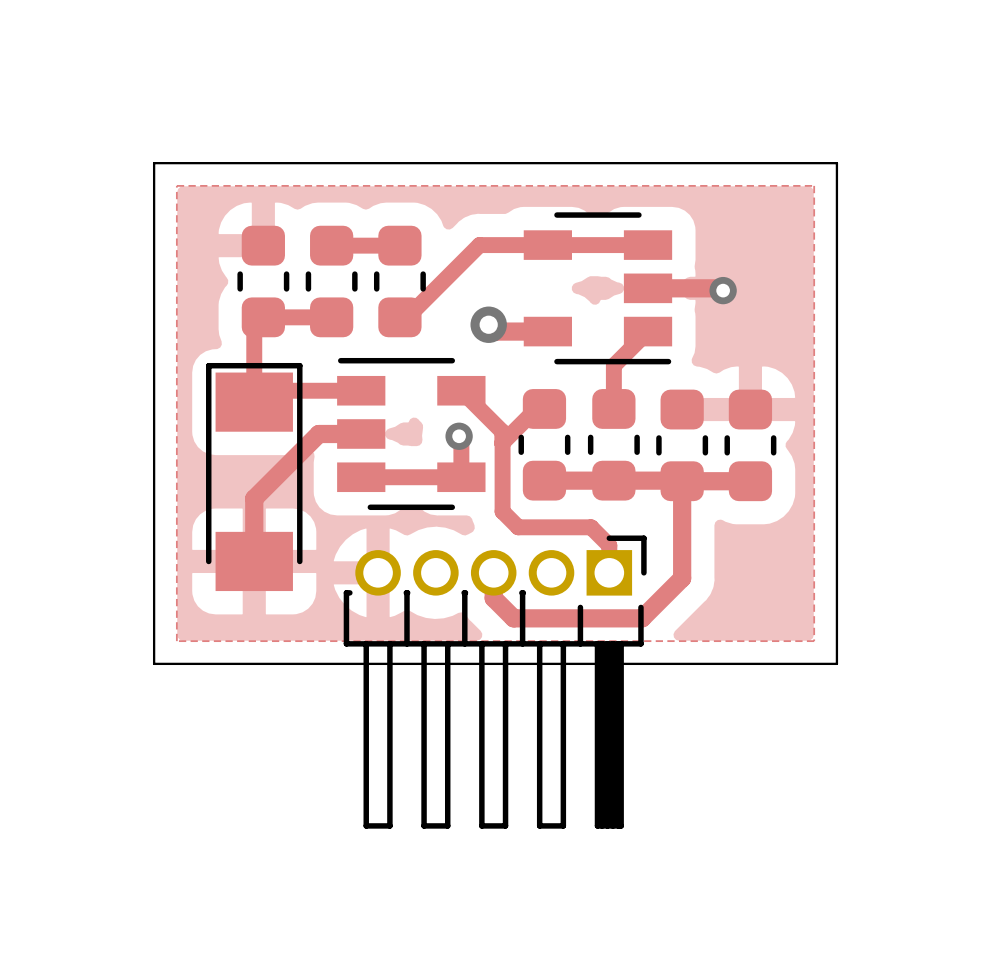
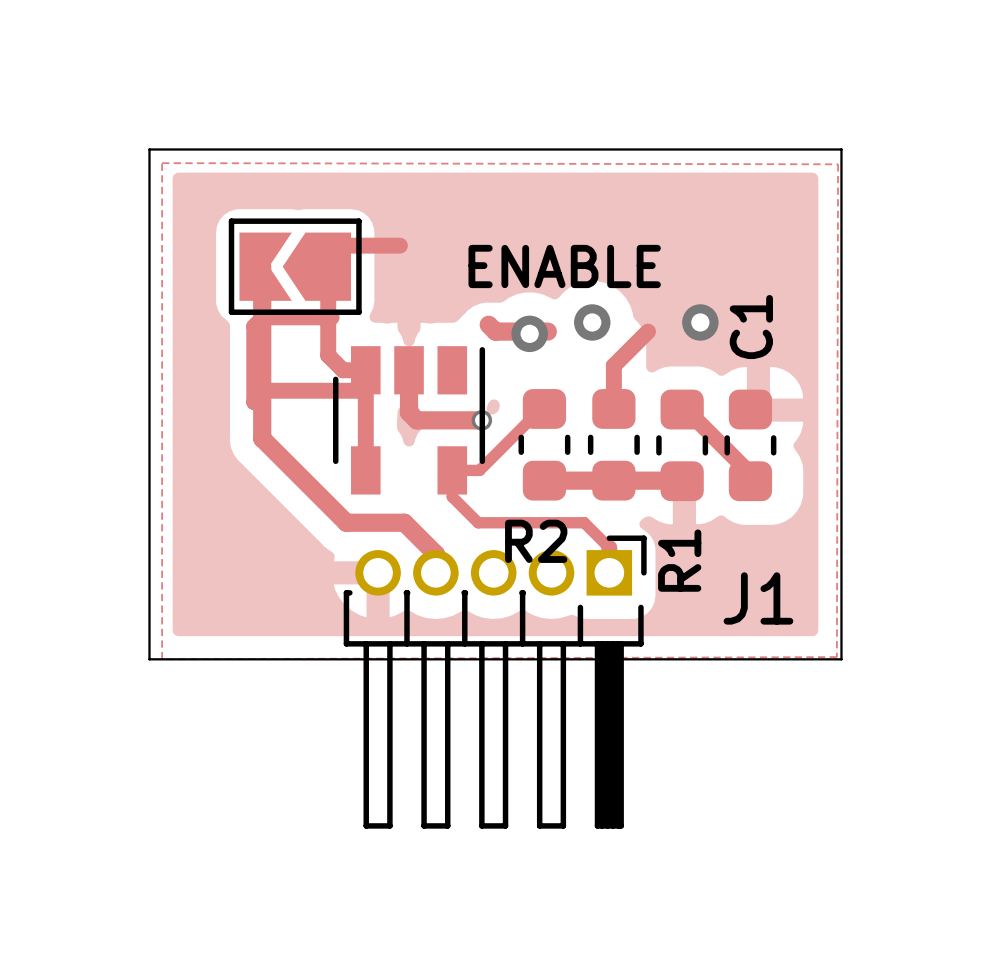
board edge: (154, 163) (836, 163) (836, 663) (154, 663) (154, 163) -> (149, 149) (149, 659) (841, 659) (841, 149) (149, 149)
zone outline: (176, 185) (176, 641) (814, 641) (814, 185) (176, 185) -> (162, 163) (162, 659) (836, 657) (838, 164) (162, 163)
track: (648, 245) (479, 245) (407, 317) (399, 317) -> none
track: none -> (262, 266) (262, 438) (346, 522) (404, 522) (435, 554) (435, 572)
part: none -> (295, 266)
track: none -> (328, 266) (328, 355) (343, 370) (365, 370) (365, 470)
text: none -> ENABLE (564, 266)
part: (263, 281) -> none
part: (331, 281) -> none
part: (399, 281) -> none
part: (597, 288) -> none
track: (648, 288) (720, 288) (723, 290) -> none
via position: (723, 290) -> (700, 322)
via: none -> (592, 322)
via position: (488, 324) -> (529, 333)
C1 name: none -> C1 (751, 327)
track: none -> (409, 370) (409, 412) (416, 420) (481, 420)
track: (461, 390) (502, 431) (502, 443) (536, 408) (541, 408) -> none
track: none -> (686, 409) (758, 481)
track: (361, 433) (318, 433) (254, 498) (254, 561) -> none
part rotation: 0° (411, 433) -> 90° clockwise (409, 420)
track: (459, 436) (461, 438) (461, 477) (361, 477) -> none
via position: (459, 436) -> (481, 420)
track: (502, 443) (502, 511) (518, 527) (591, 527) (609, 545) (609, 547) -> (541, 408) (479, 470) (452, 470) (452, 496) (478, 522) (584, 522) (609, 547)
part: (254, 477) -> none
track: (750, 481) (682, 481) (682, 578) (642, 618) (513, 618) (493, 598) (493, 572) -> none
R2 name: none -> R2 (536, 541)
R1 name: none -> R1 (679, 560)
J1 name: none -> J1 (758, 598)

